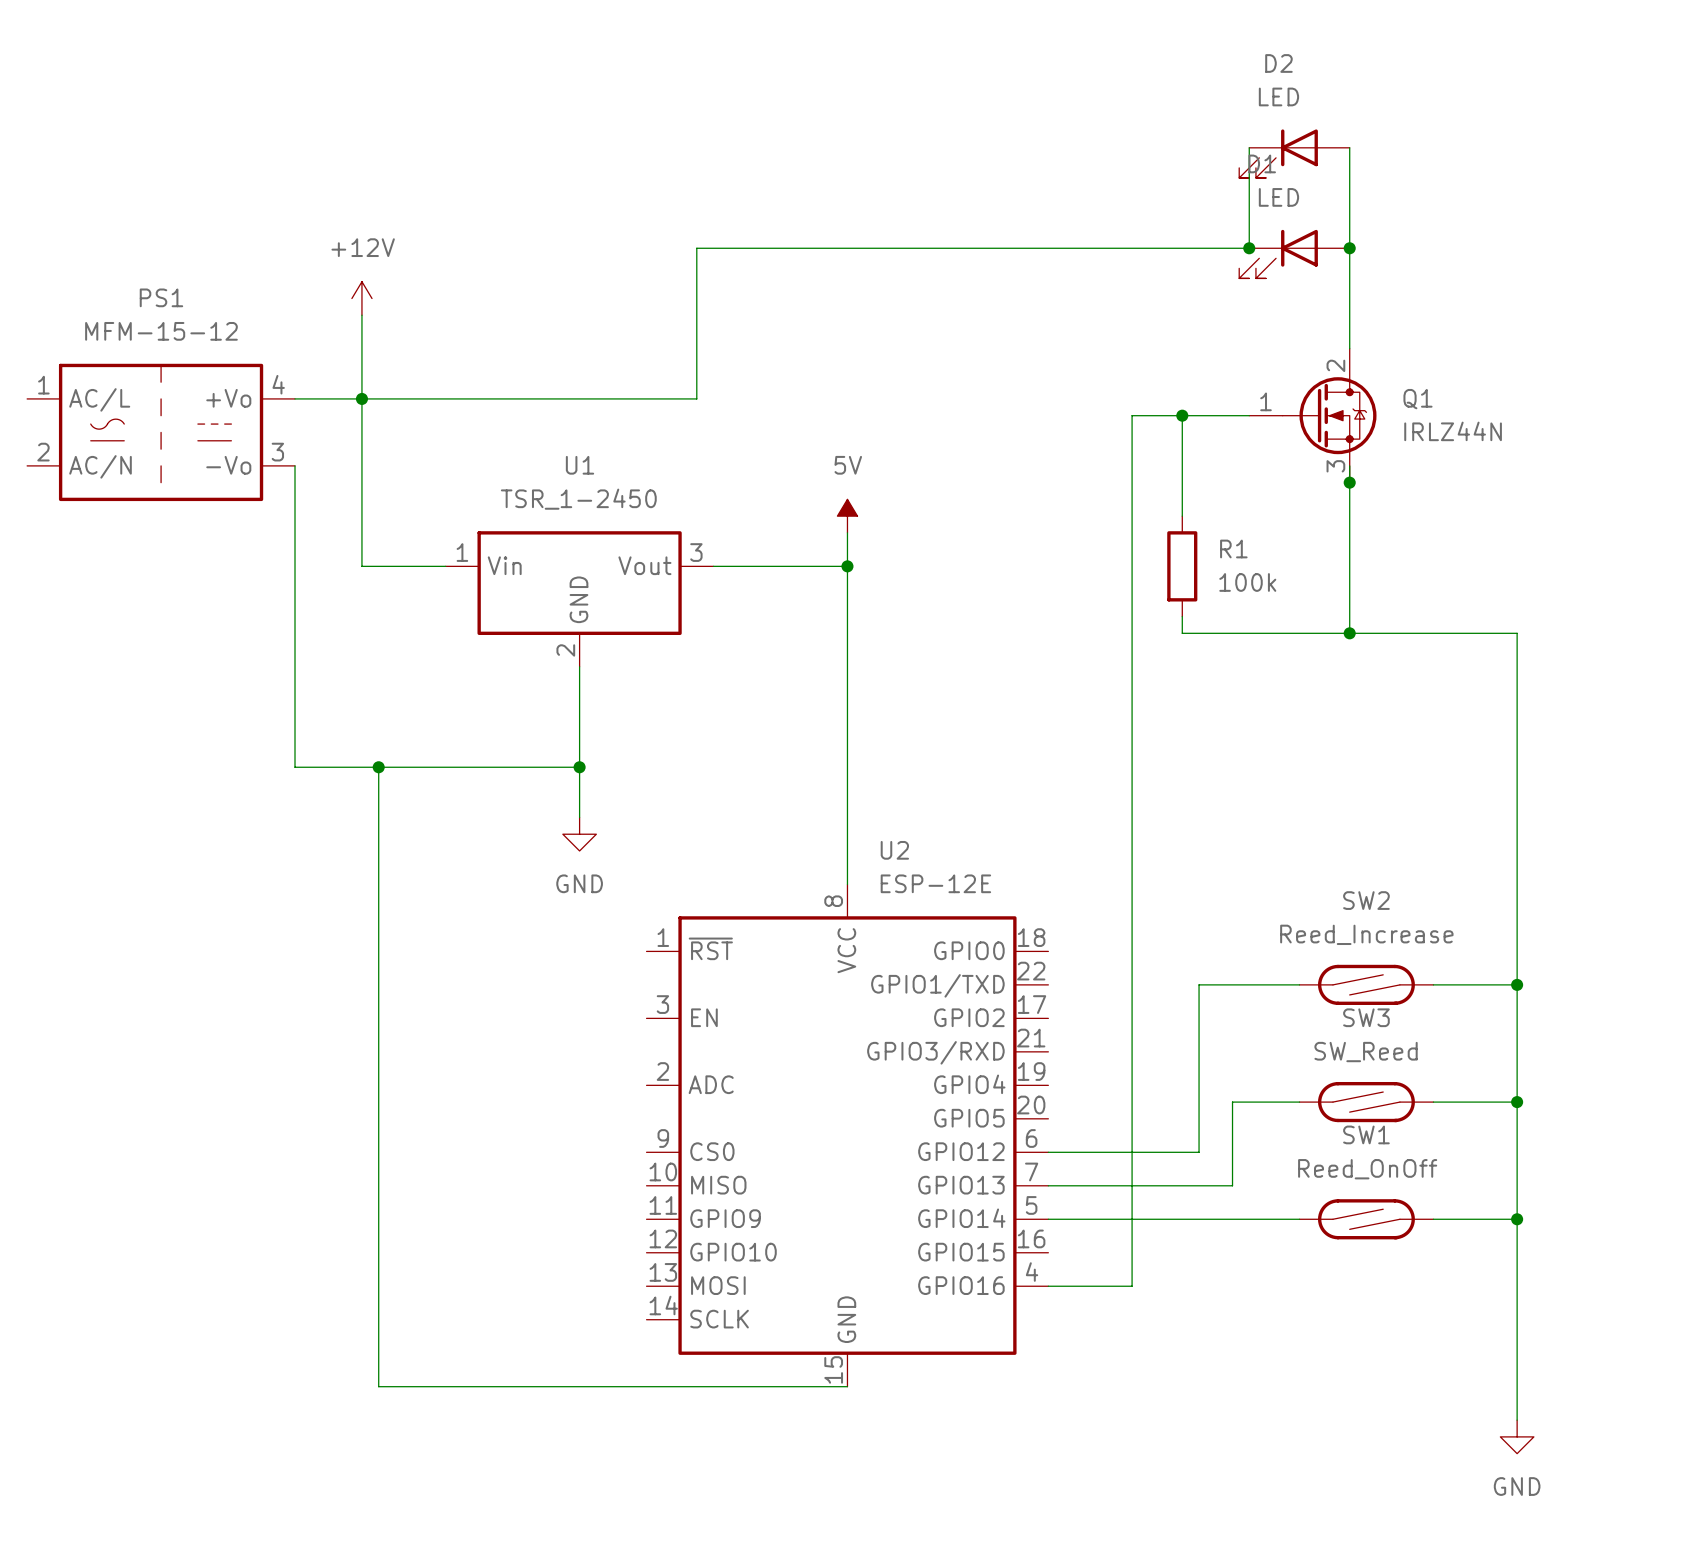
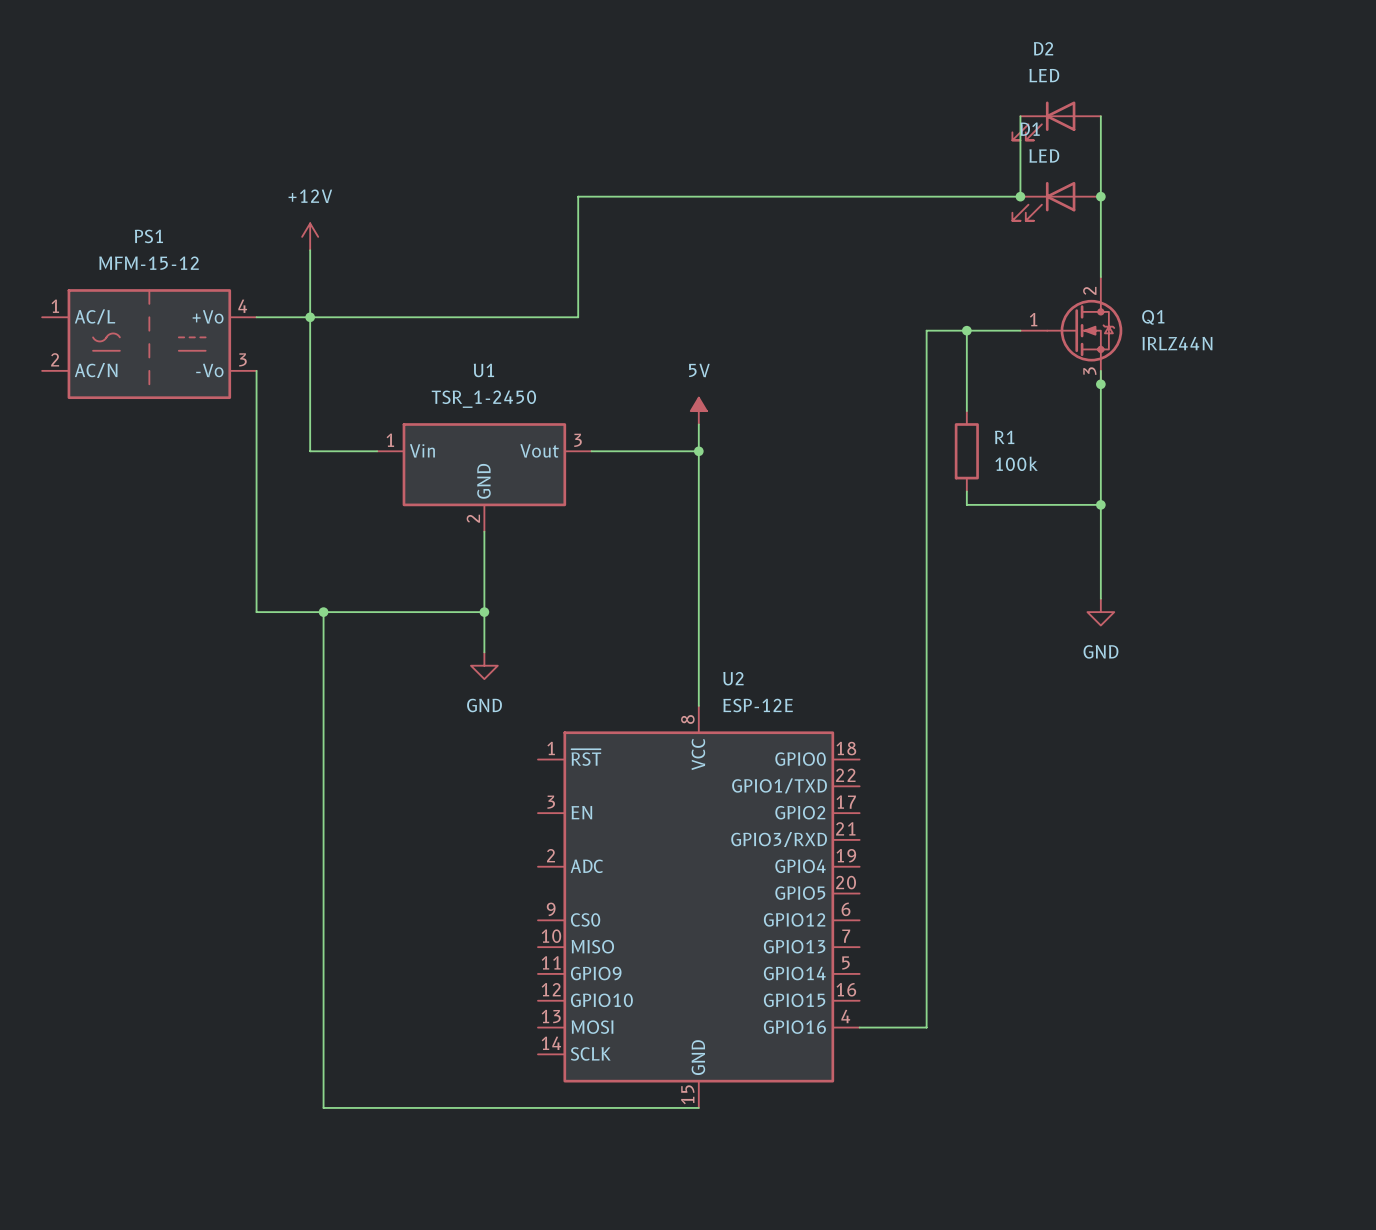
wire: (1349, 633) (1517, 633) (1517, 1420) -> (1100, 504) (1100, 598)
power symbol: none -> GND (1100, 612)
wire: (1299, 984) (1199, 984) (1199, 1152) (1048, 1152) -> none
SW2: Reed_Increase (1366, 984) -> none
wire: (1433, 984) (1517, 984) -> none
junction: (1517, 984) -> none
wire: (1299, 1102) (1232, 1102) (1232, 1185) (1048, 1185) -> none
SW3: SW_Reed (1366, 1102) -> none
wire: (1433, 1102) (1517, 1102) -> none
junction: (1517, 1102) -> none
wire: (1048, 1219) (1299, 1219) -> none
SW1: Reed_OnOff (1366, 1219) -> none
wire: (1433, 1219) (1517, 1219) -> none
junction: (1517, 1219) -> none
power symbol: GND (1517, 1436) -> none

